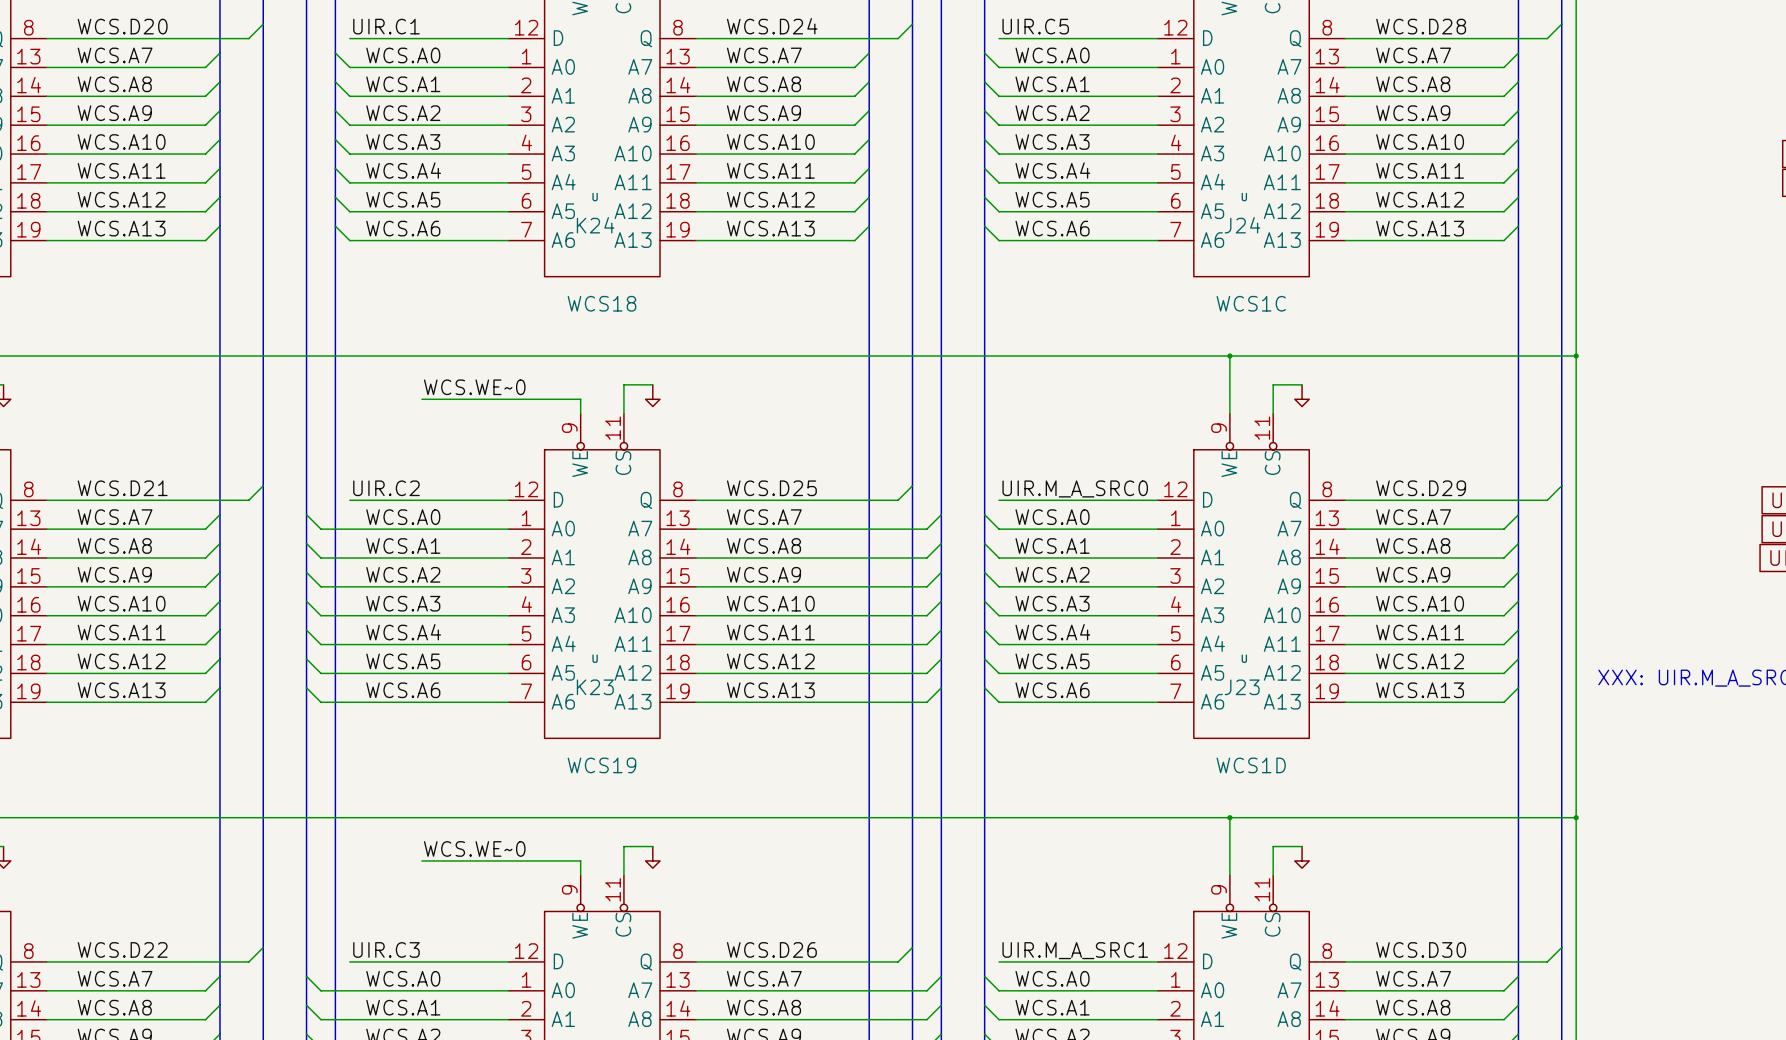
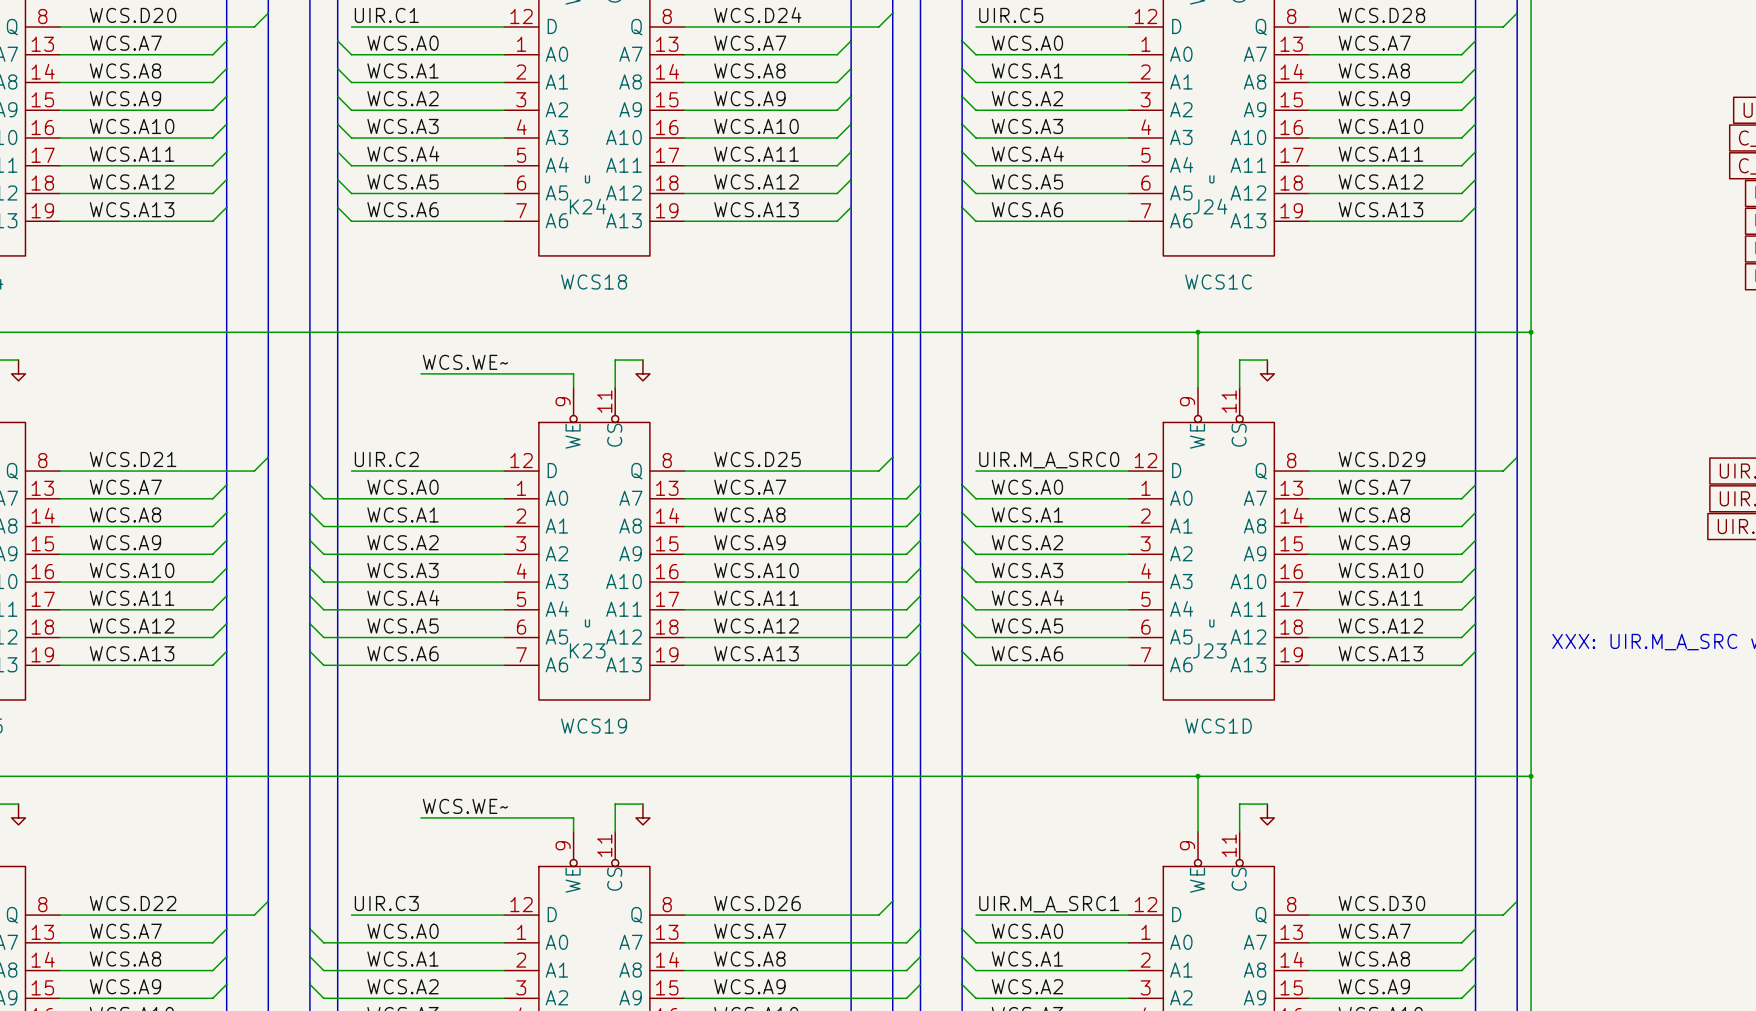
label: WCS.WE~0 (474, 387) -> WCS.WE~ (465, 362)
label: WCS.WE~0 (474, 848) -> WCS.WE~ (465, 806)

